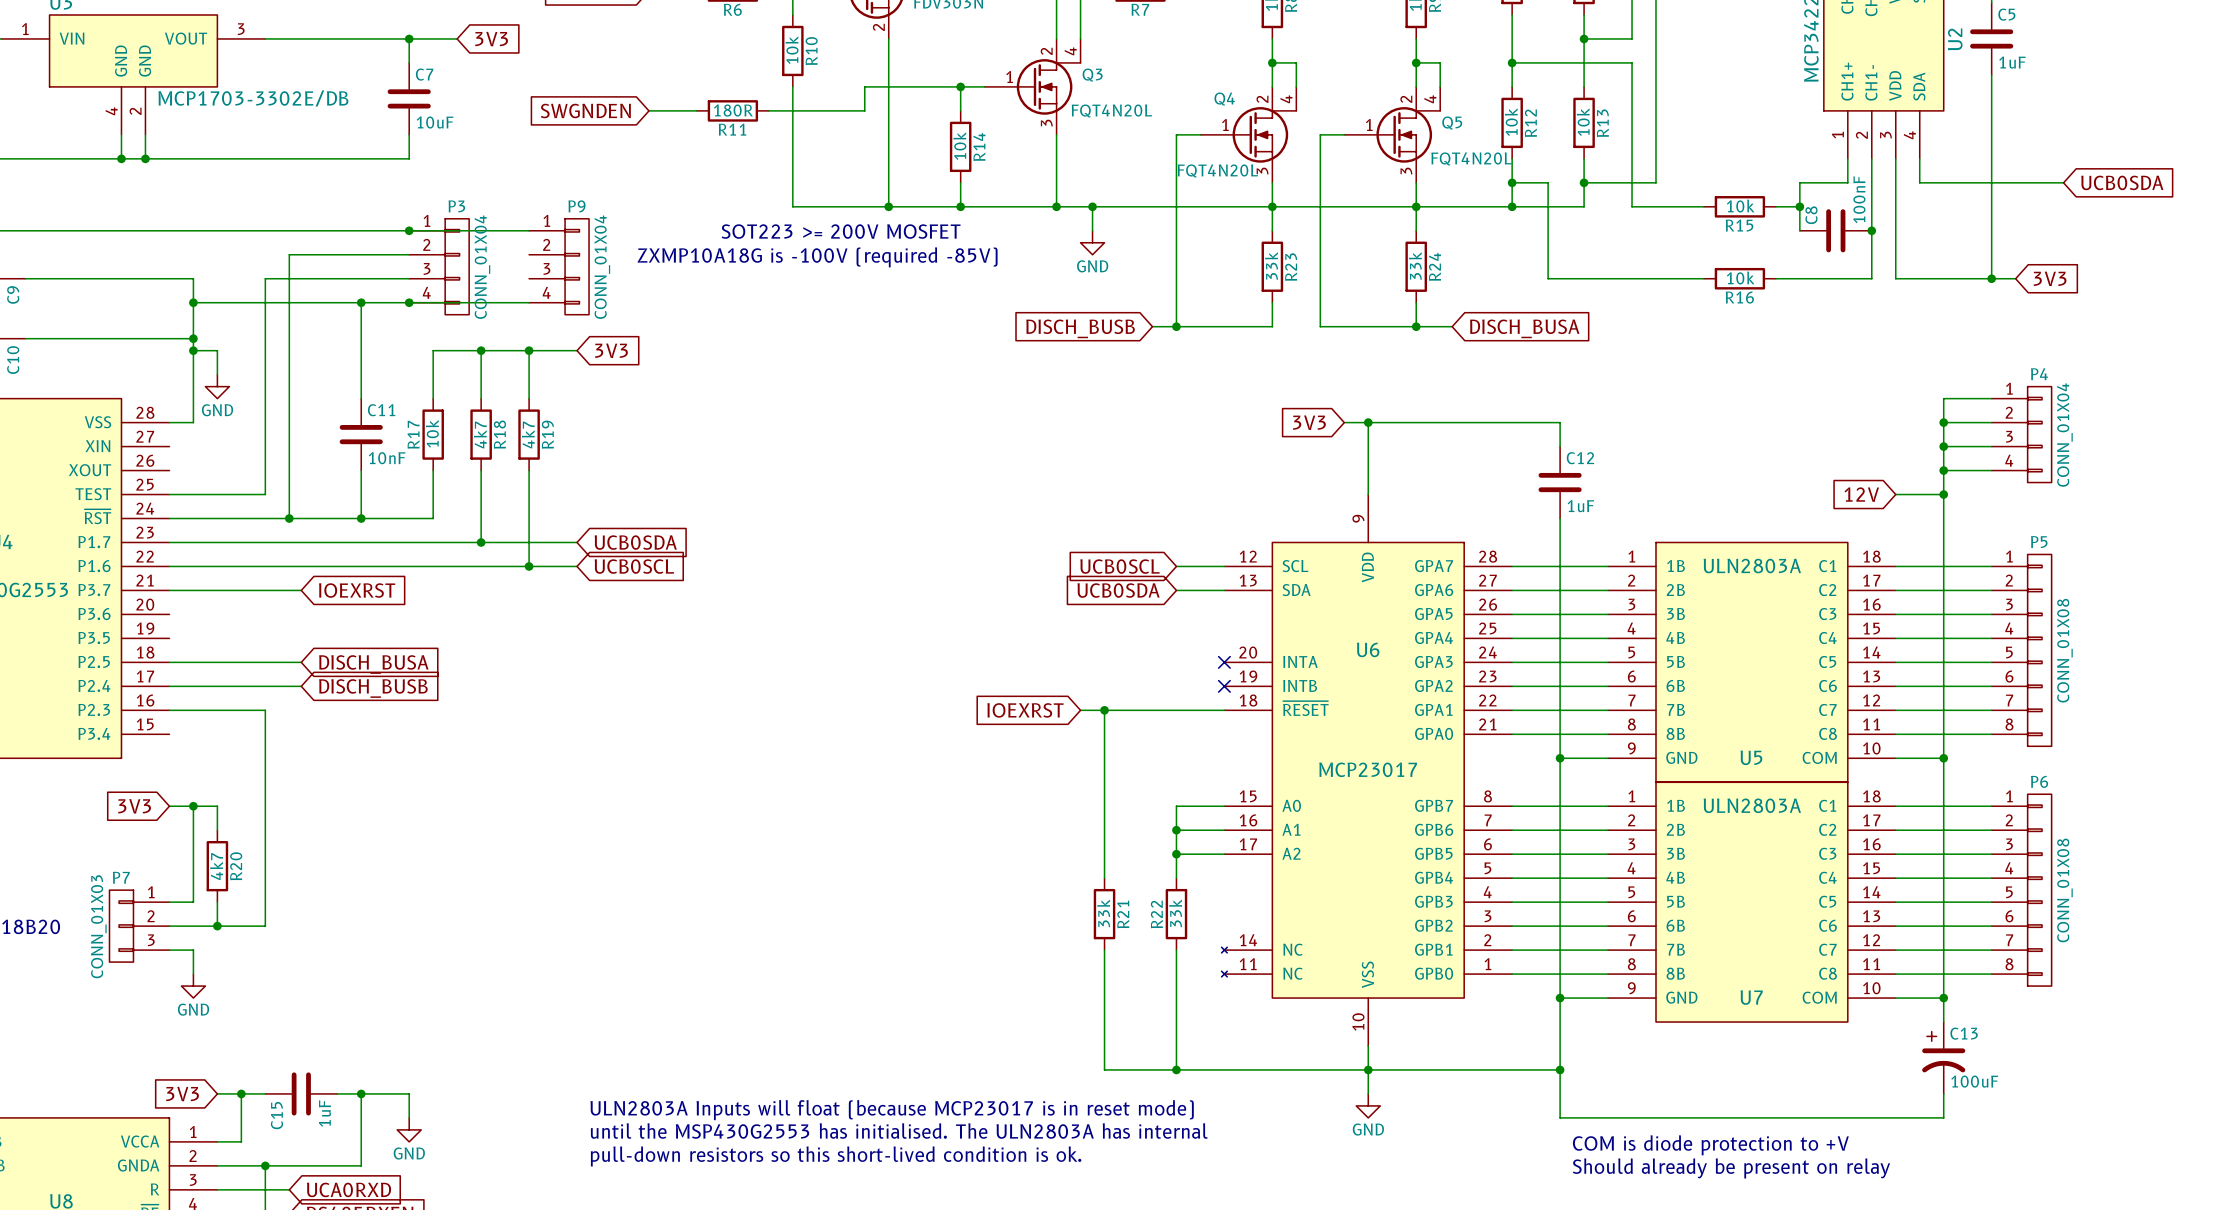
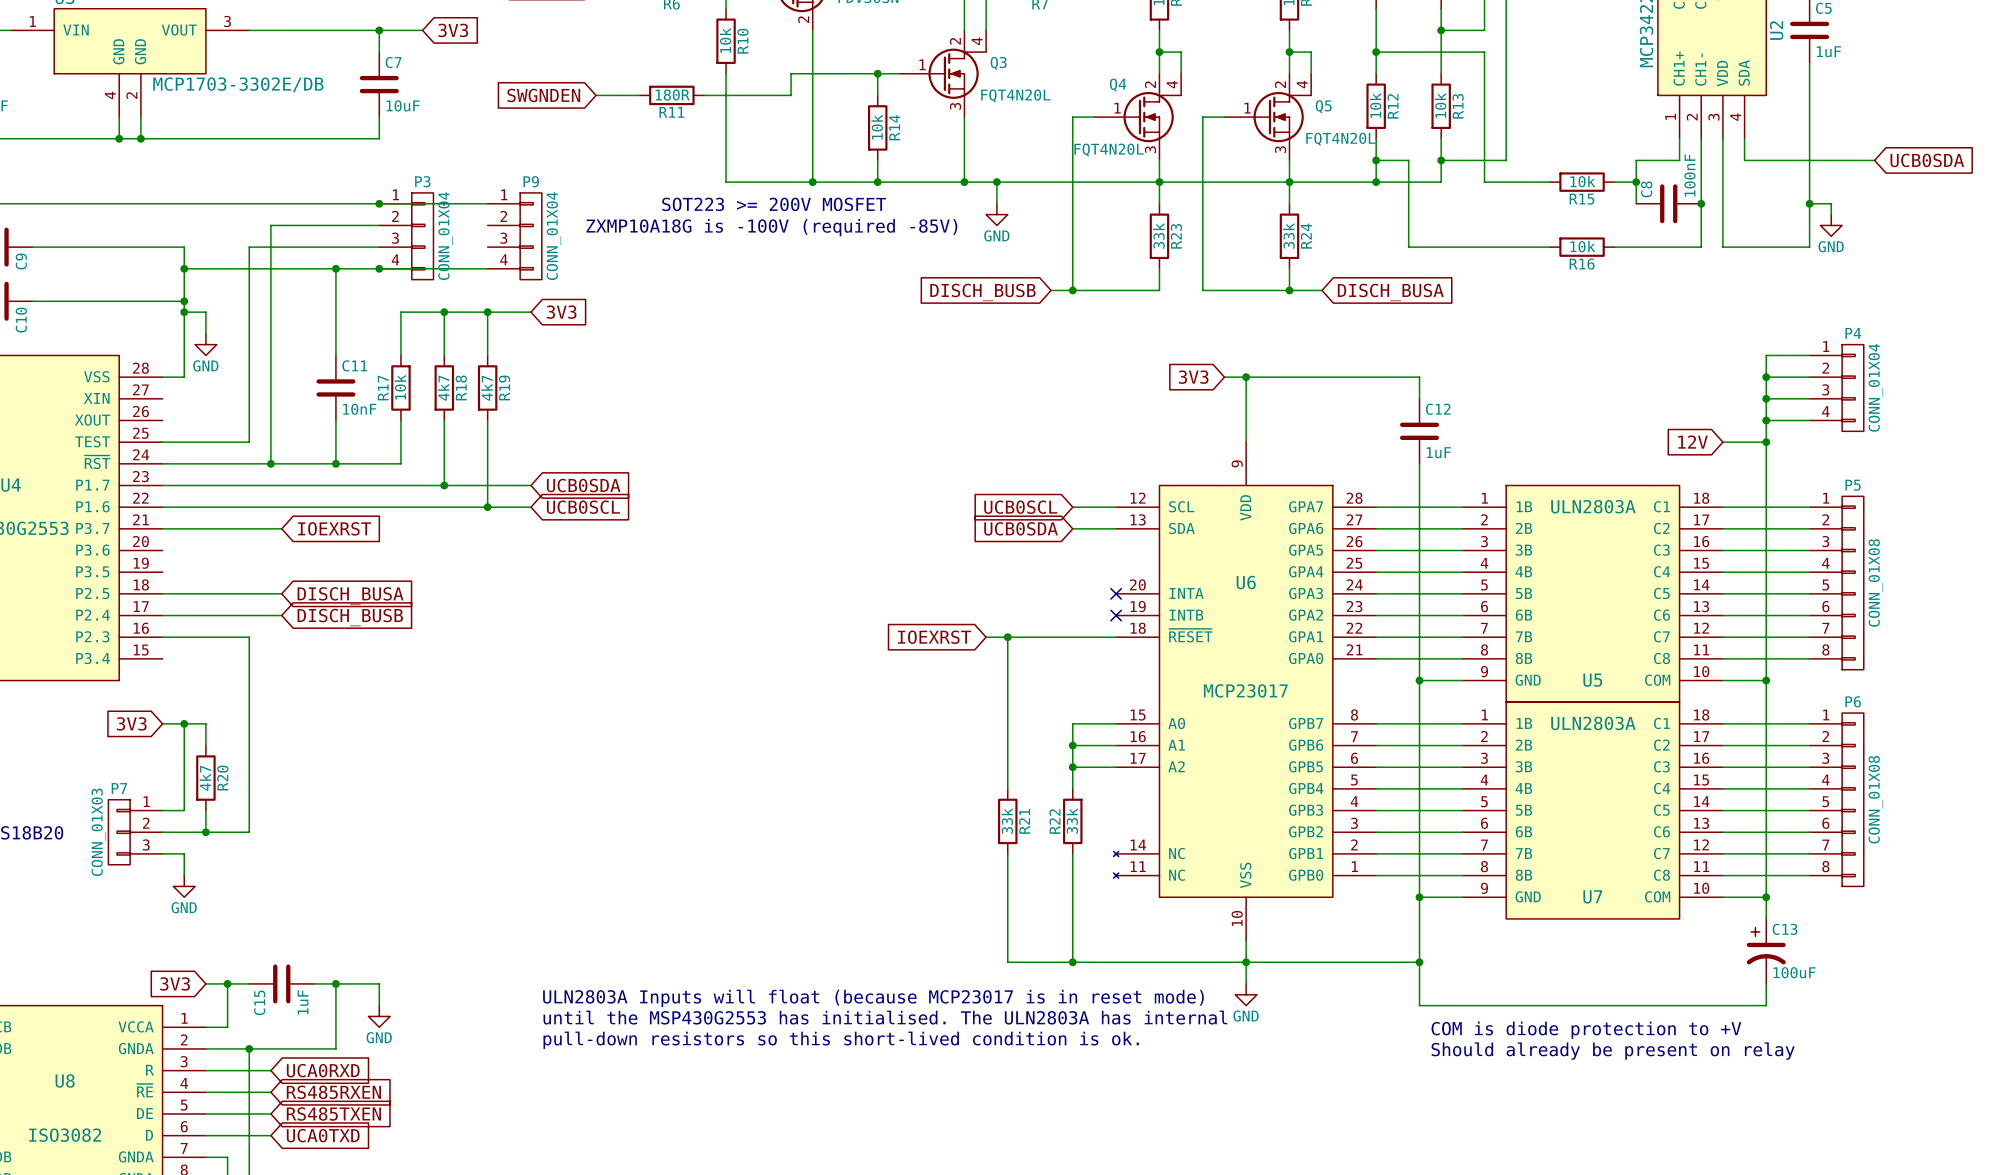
wire: none -> (1809, 203) (1831, 203) (1831, 214)
power symbol: none -> GND (1831, 225)
wire: (1991, 278) (2015, 278) -> none
junction position: (1991, 278) -> (1809, 203)
global label: 3V3 (2050, 278) -> none

